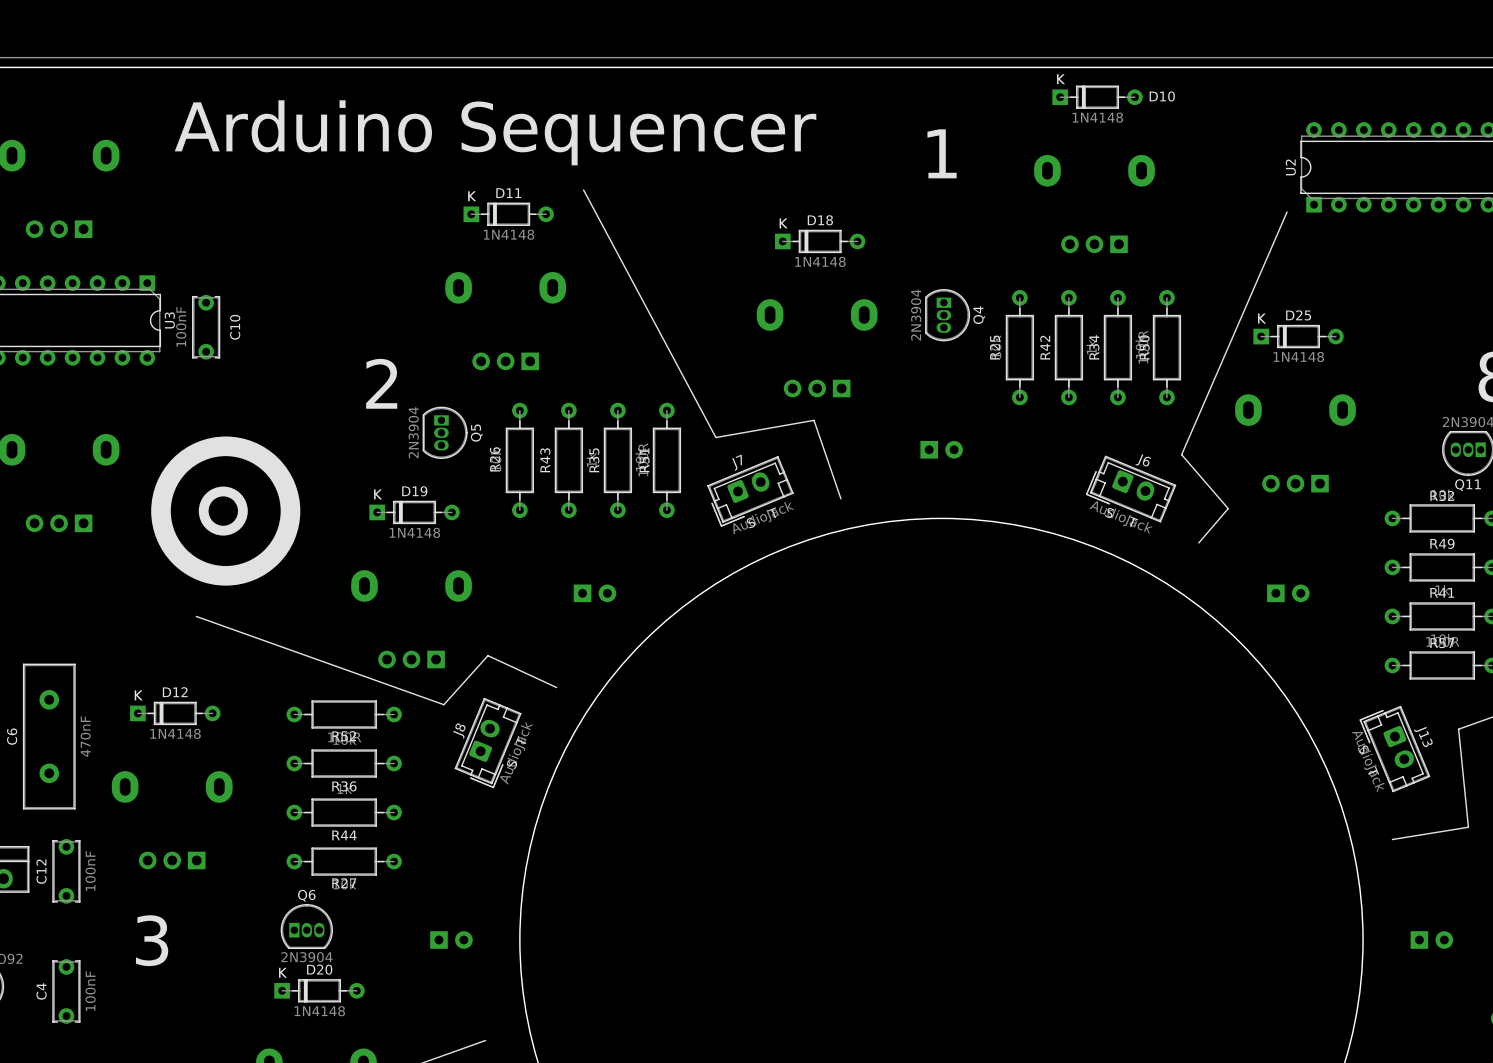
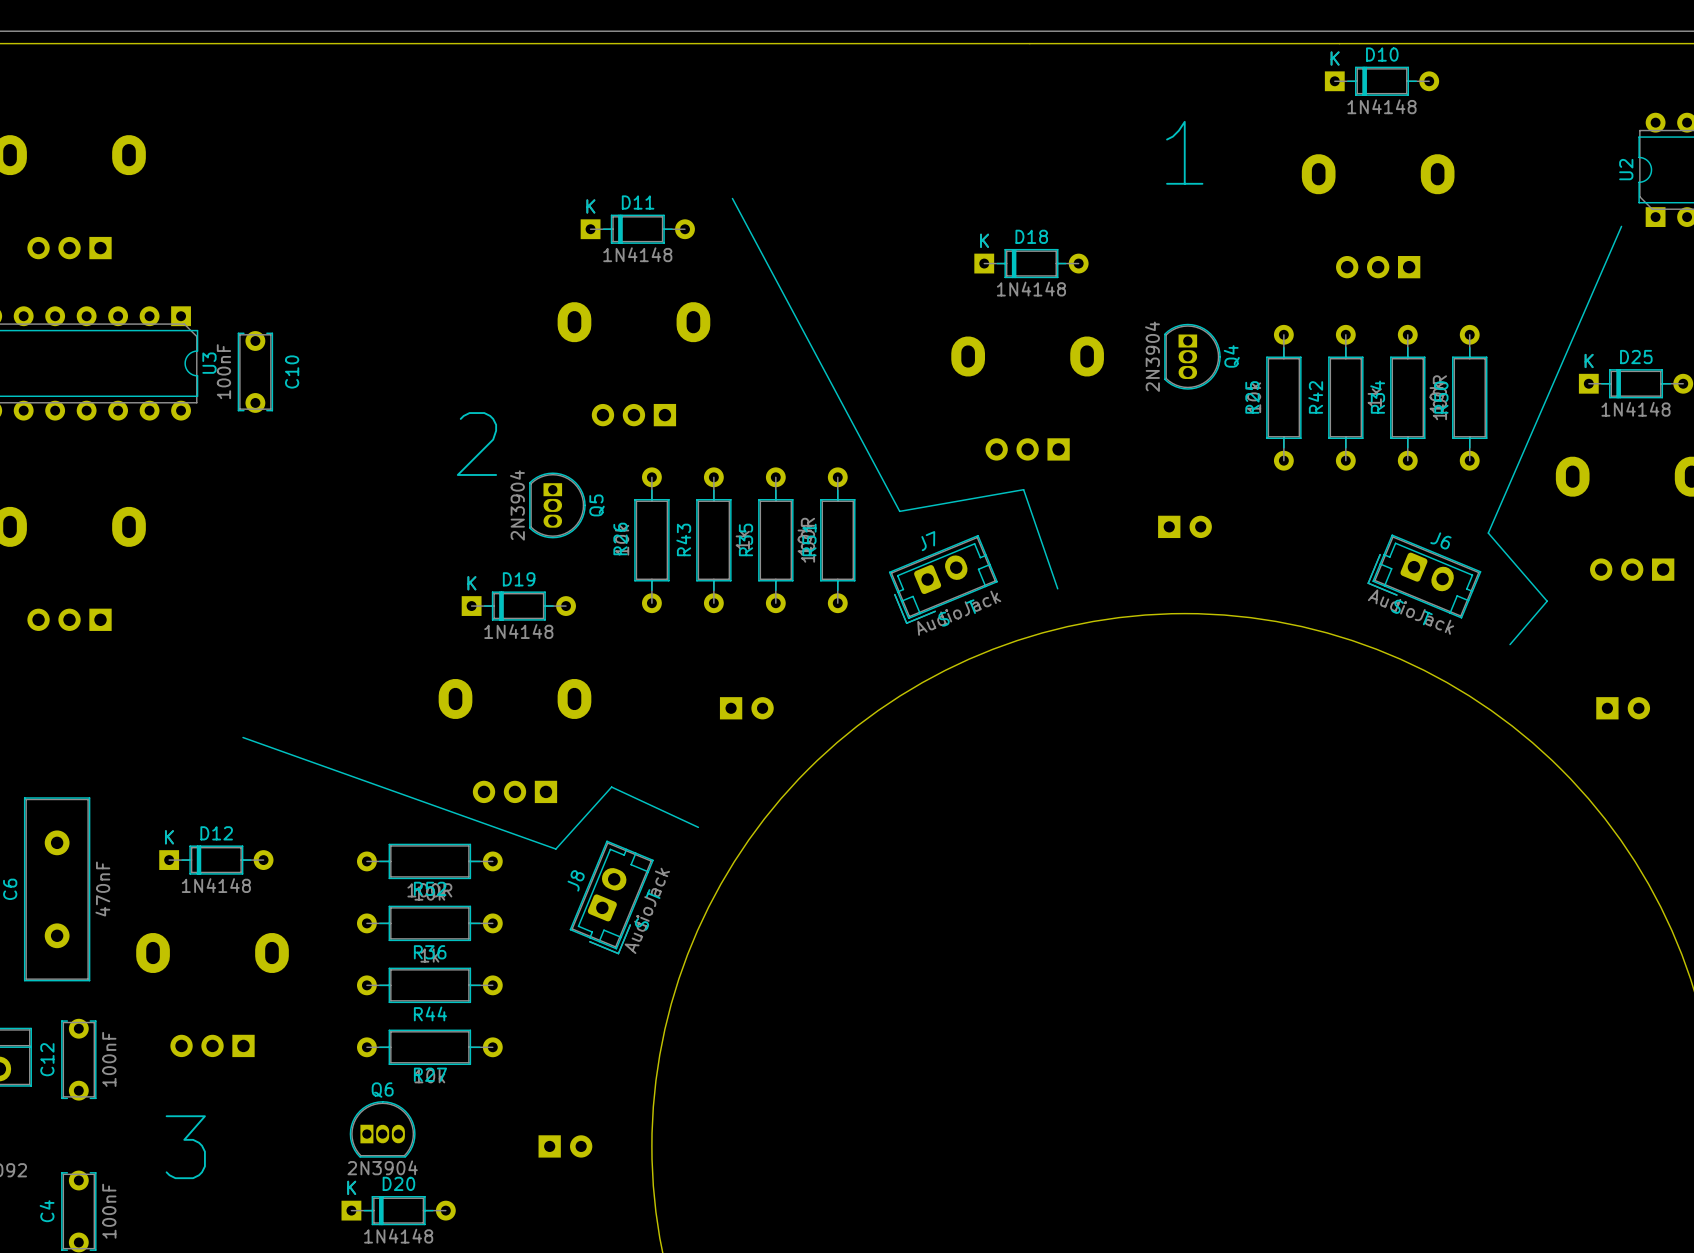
D10 name position: D10 (1162, 96) -> D10 (1382, 54)
text: Arduino Sequencer (495, 132) -> none
drawing: [151, 436, 301, 586] -> none

